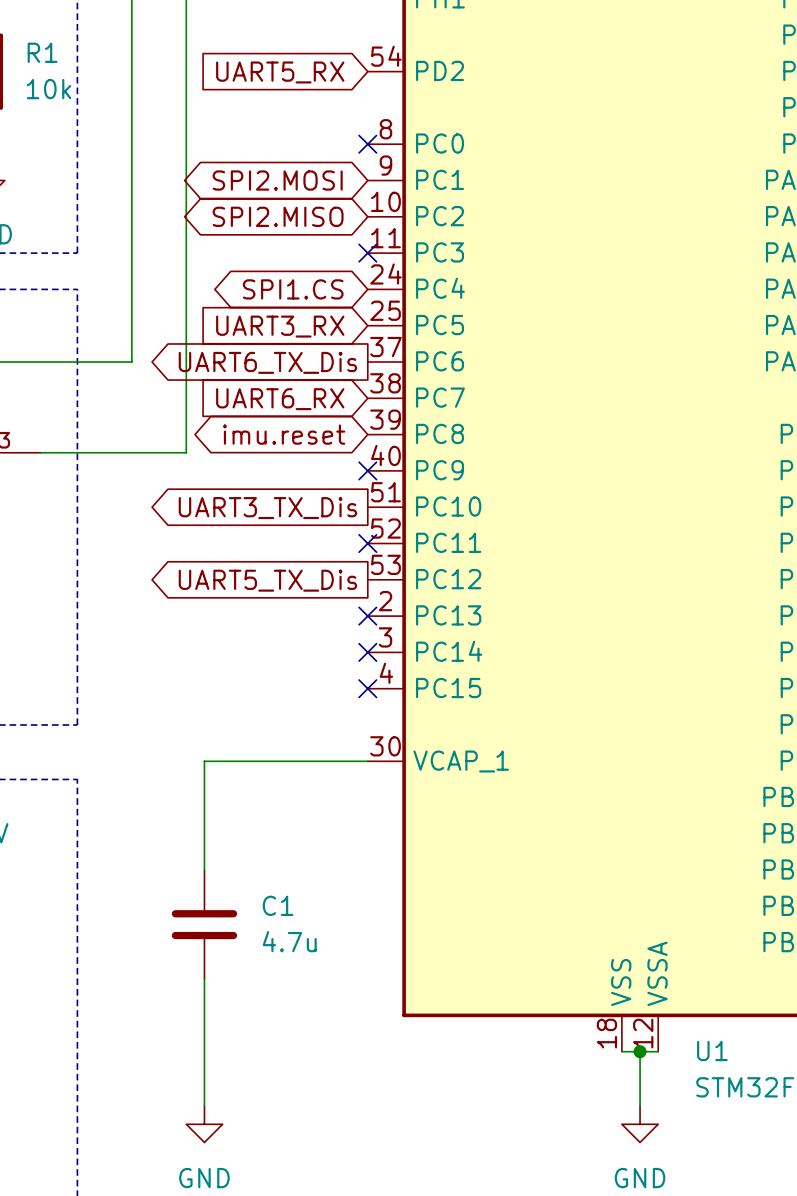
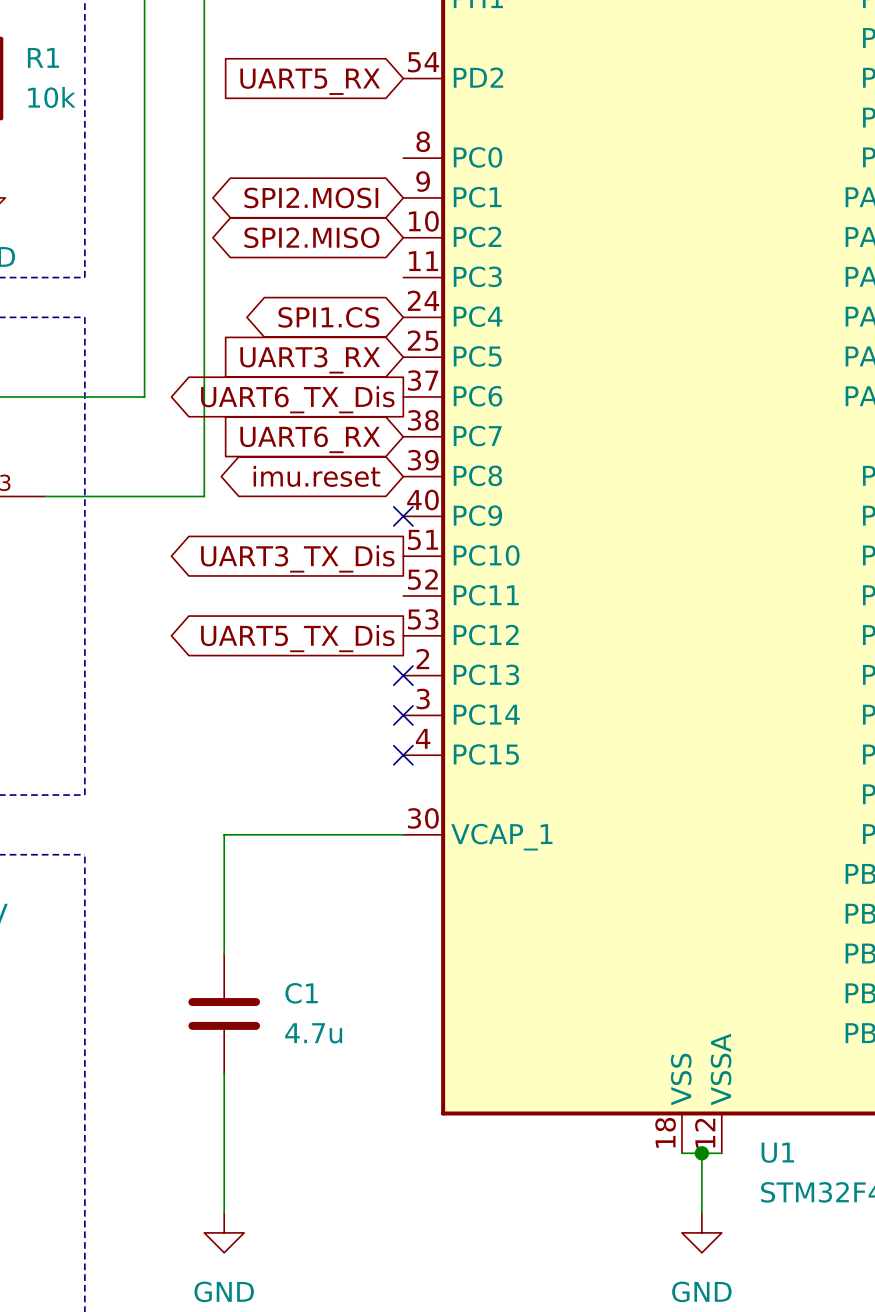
no-connect mark: (367, 144) -> none
no-connect mark: (367, 253) -> none
no-connect mark: (367, 543) -> none

